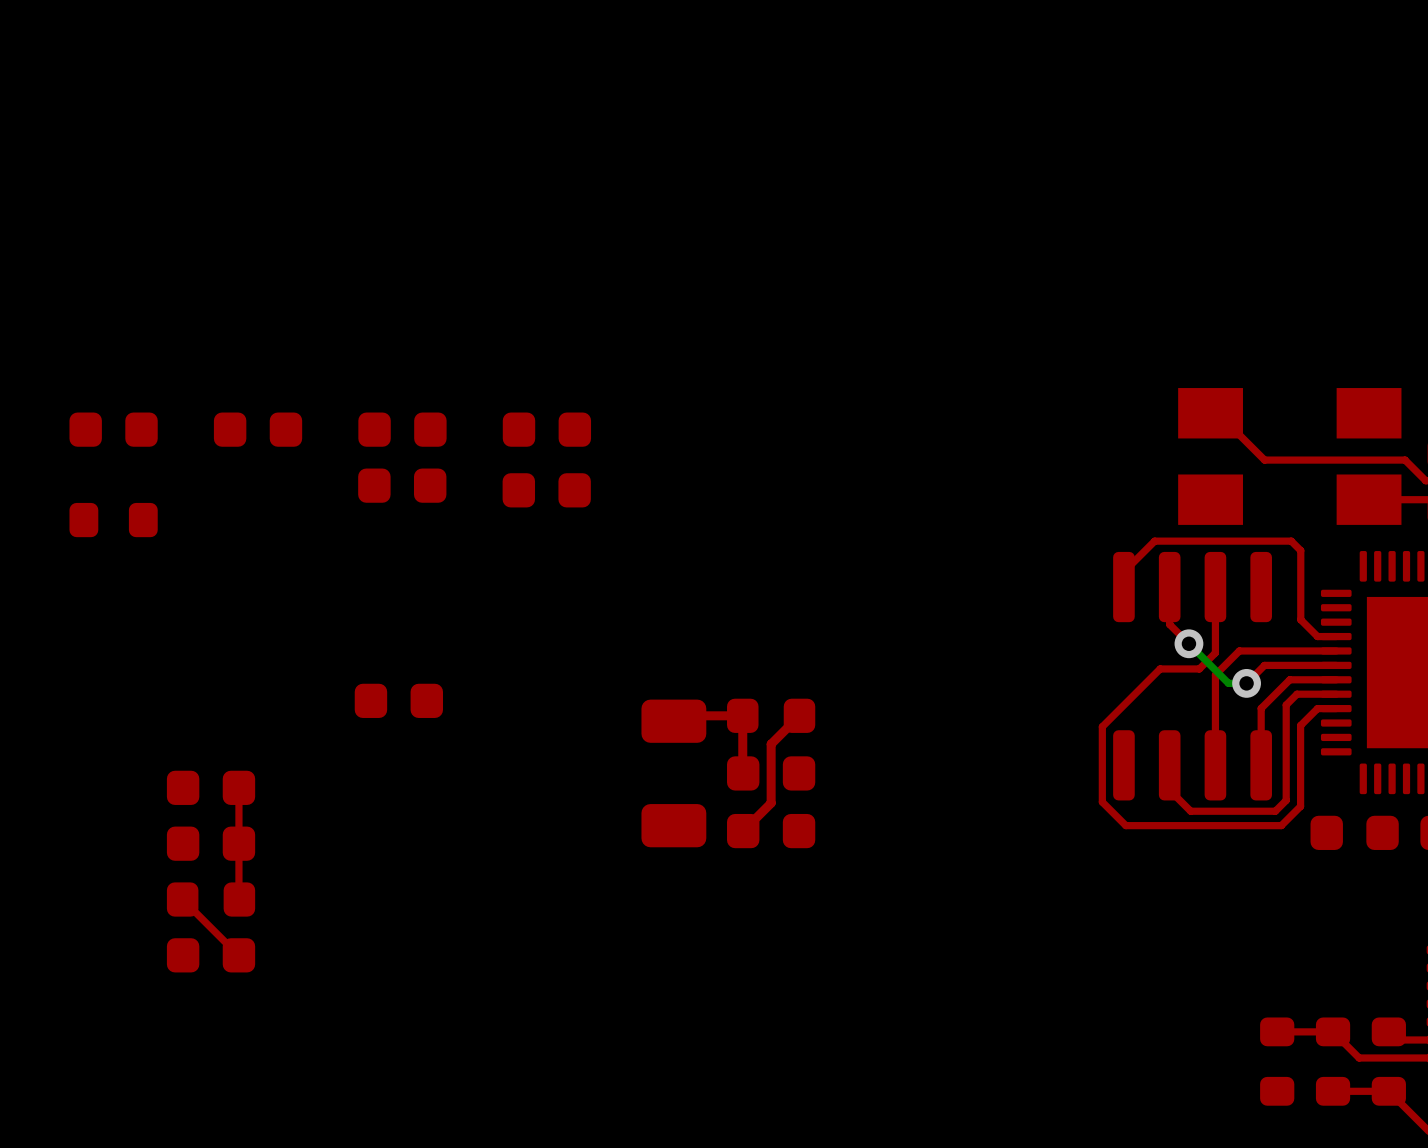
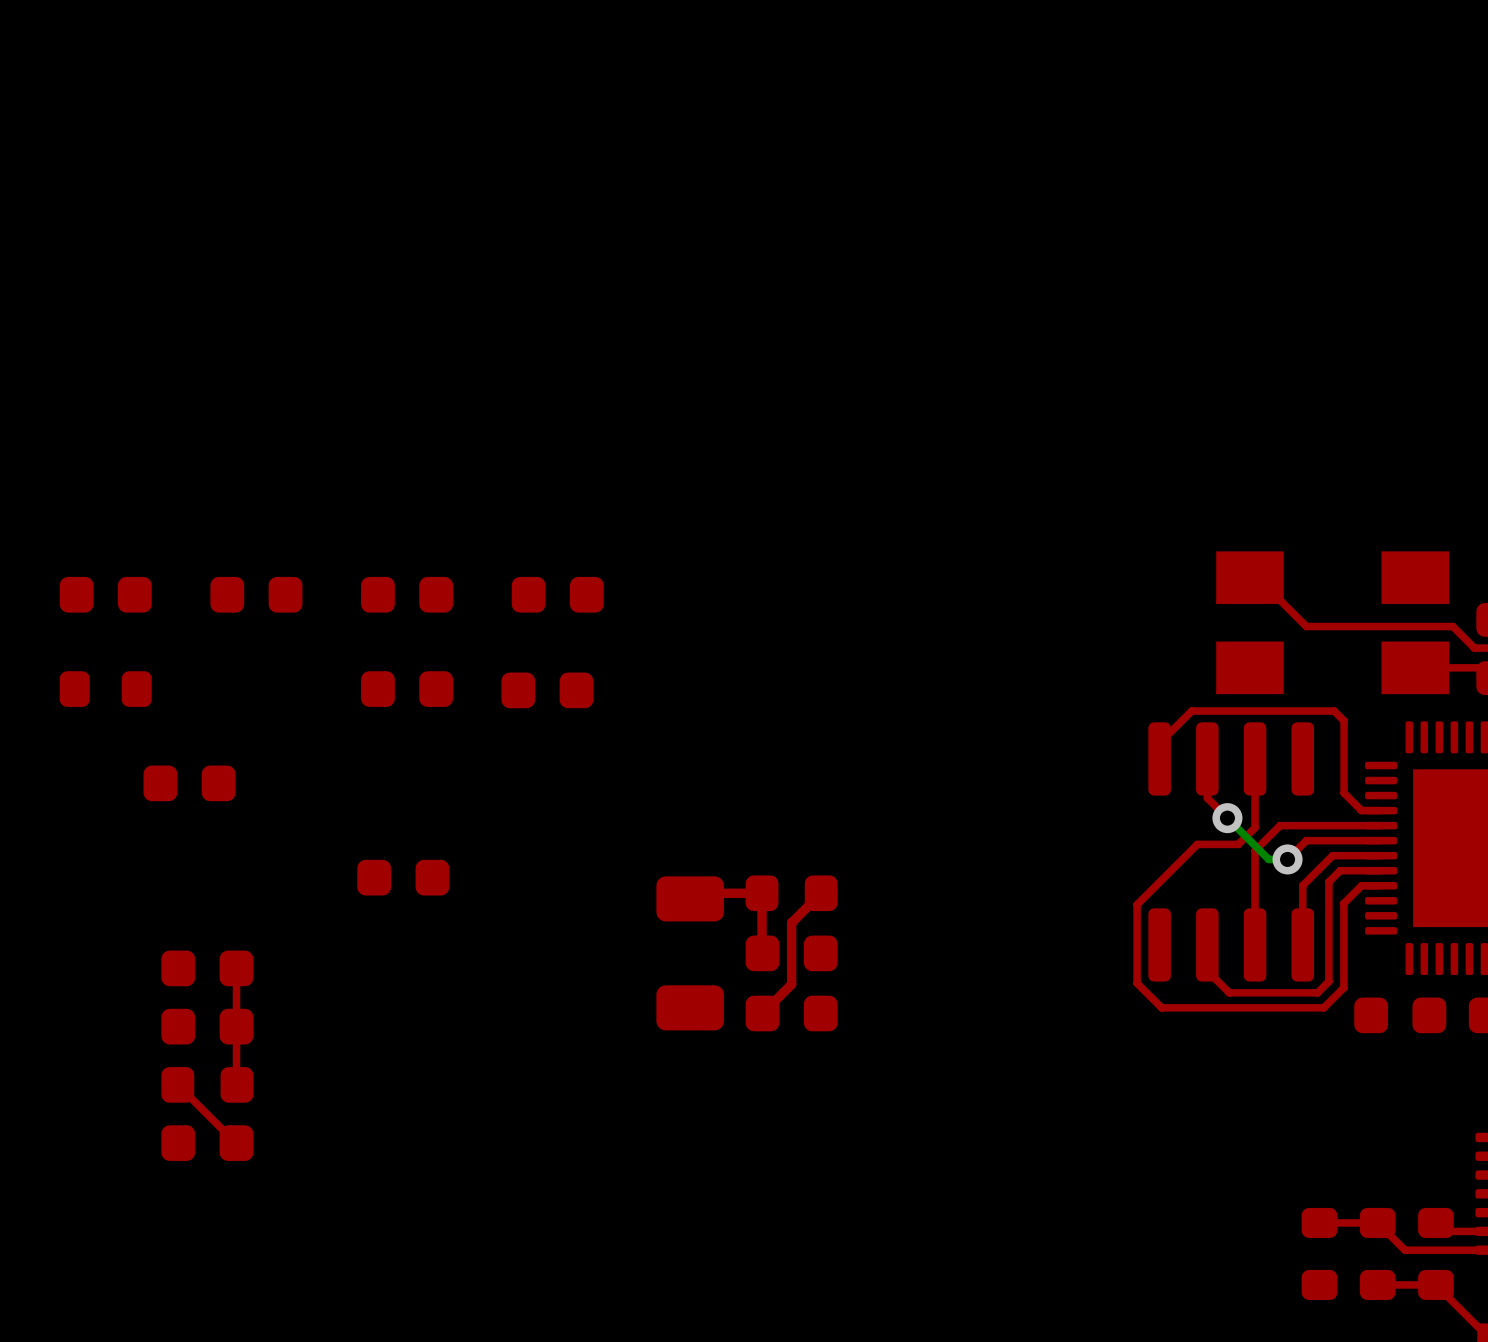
part position: (402, 485) -> (407, 689)
part position: (546, 490) -> (547, 690)
part: none -> (189, 783)

